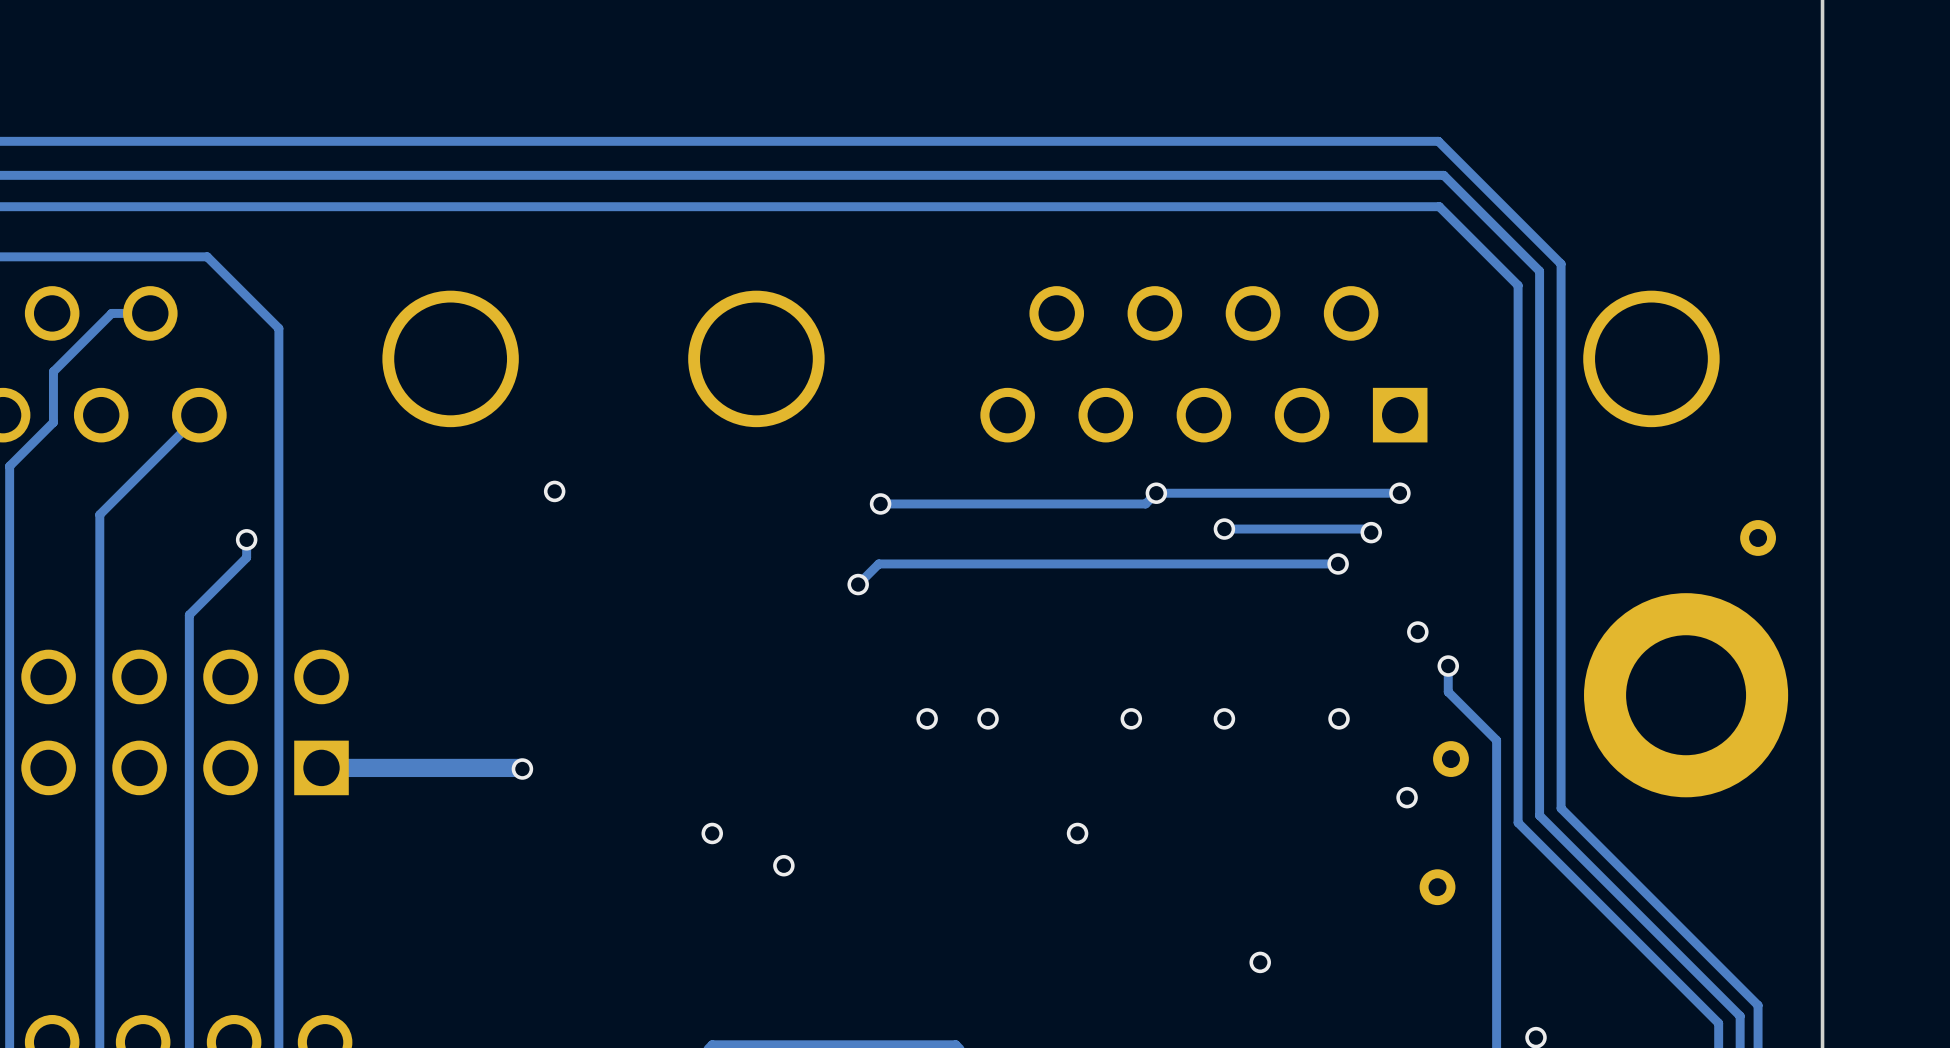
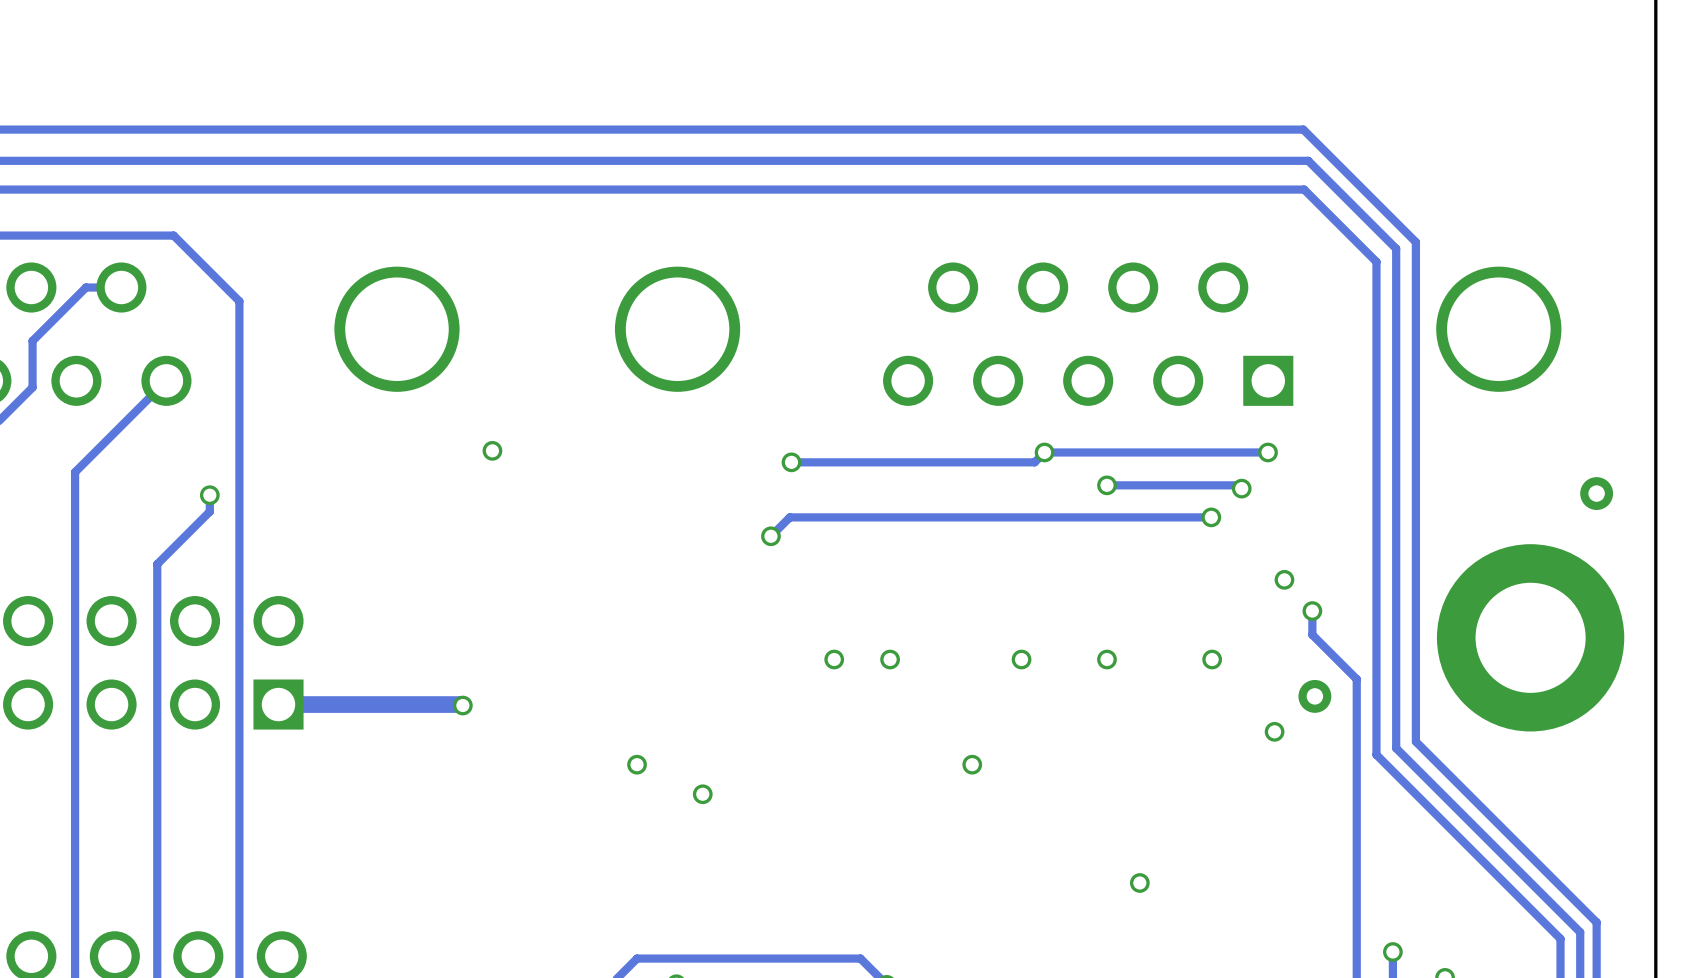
part: (1437, 887) -> none

